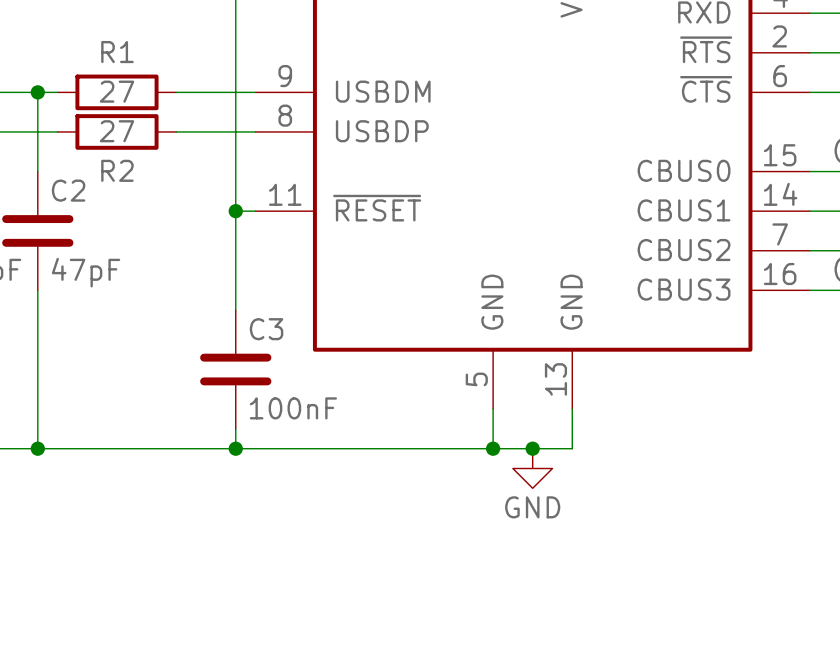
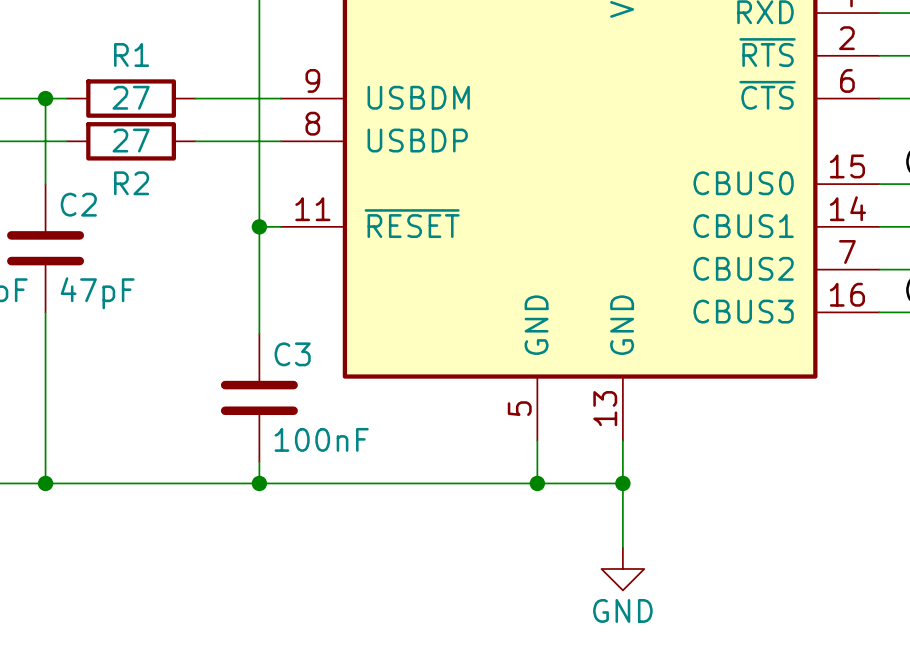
junction position: (532, 448) -> (622, 483)
wire: none -> (622, 483) (622, 547)
power symbol position: GND (532, 468) -> GND (622, 568)

